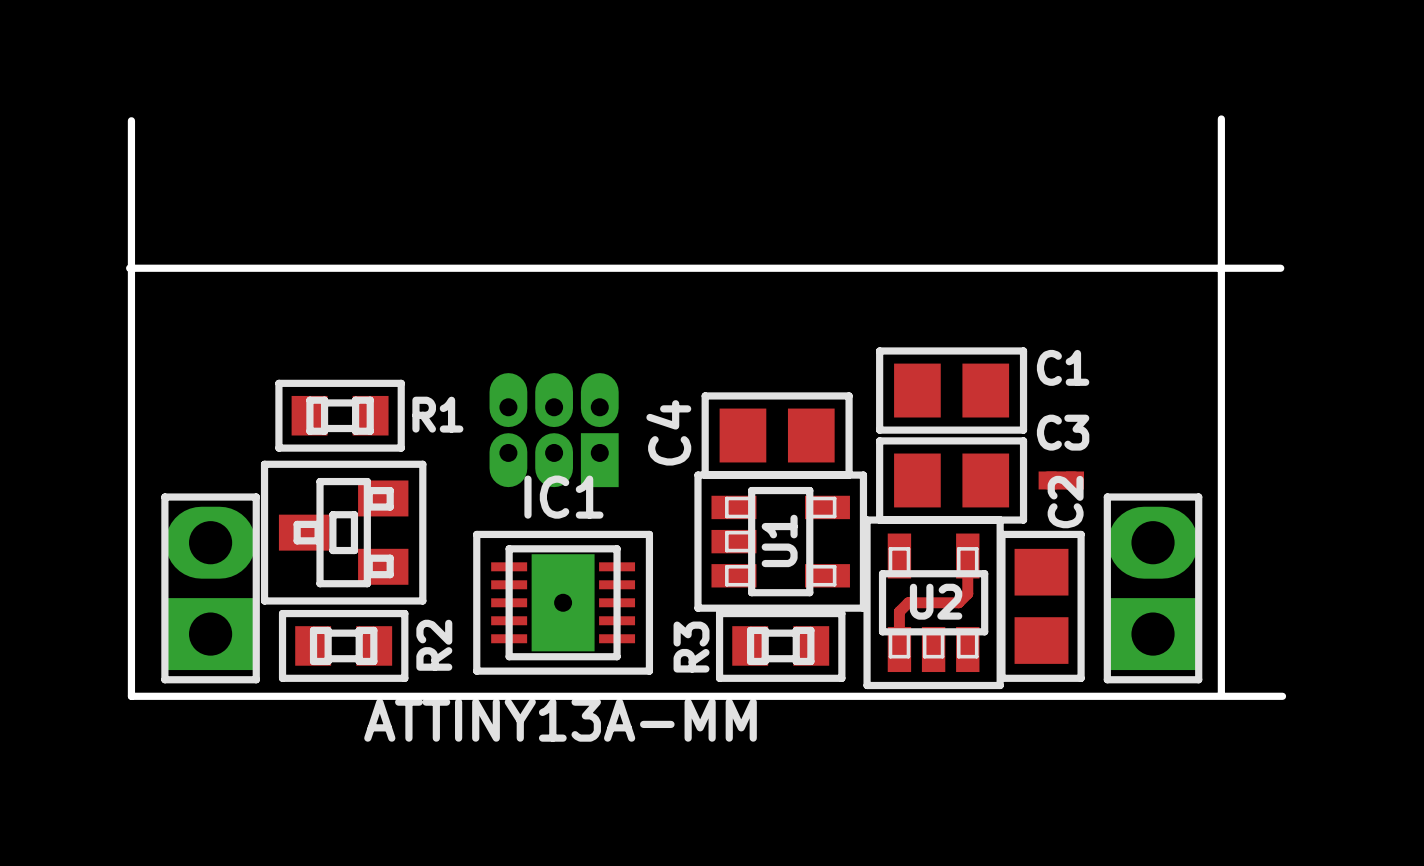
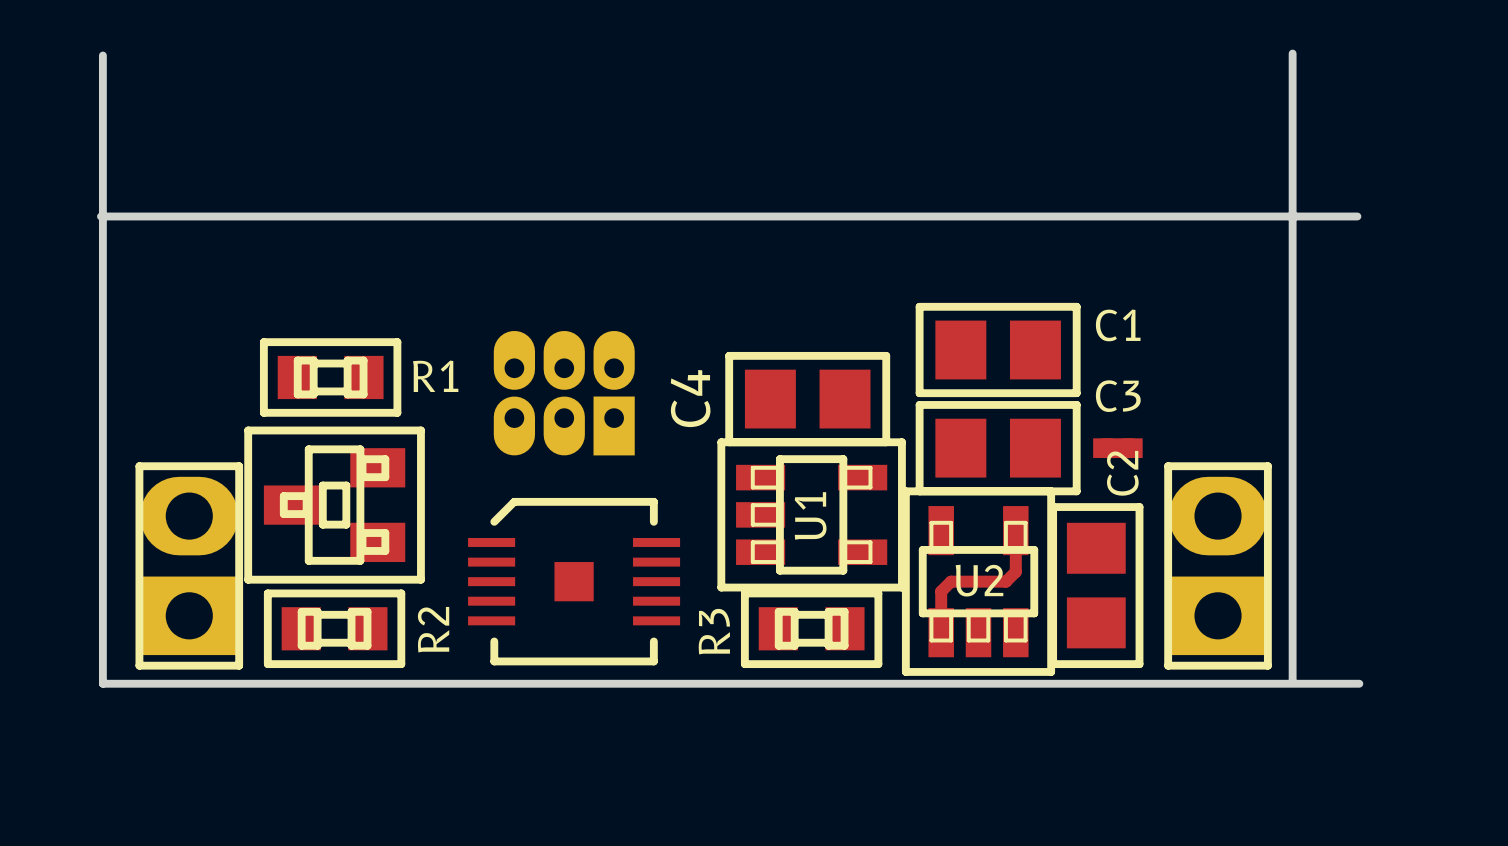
IC1: ATTINY13A-MM (563, 602) -> none
part: none -> (574, 581)

